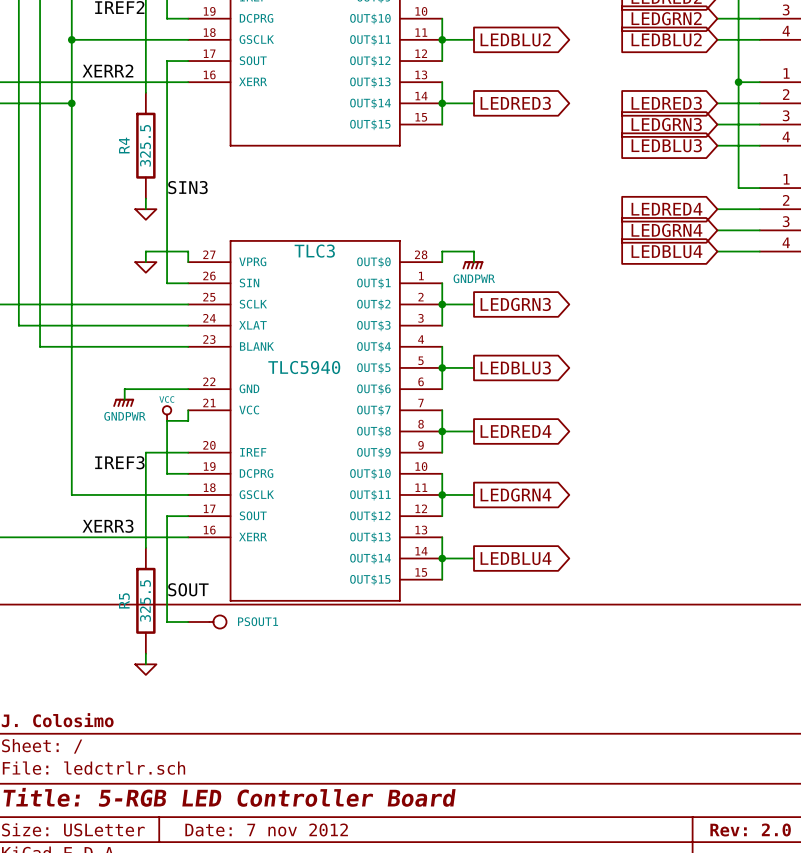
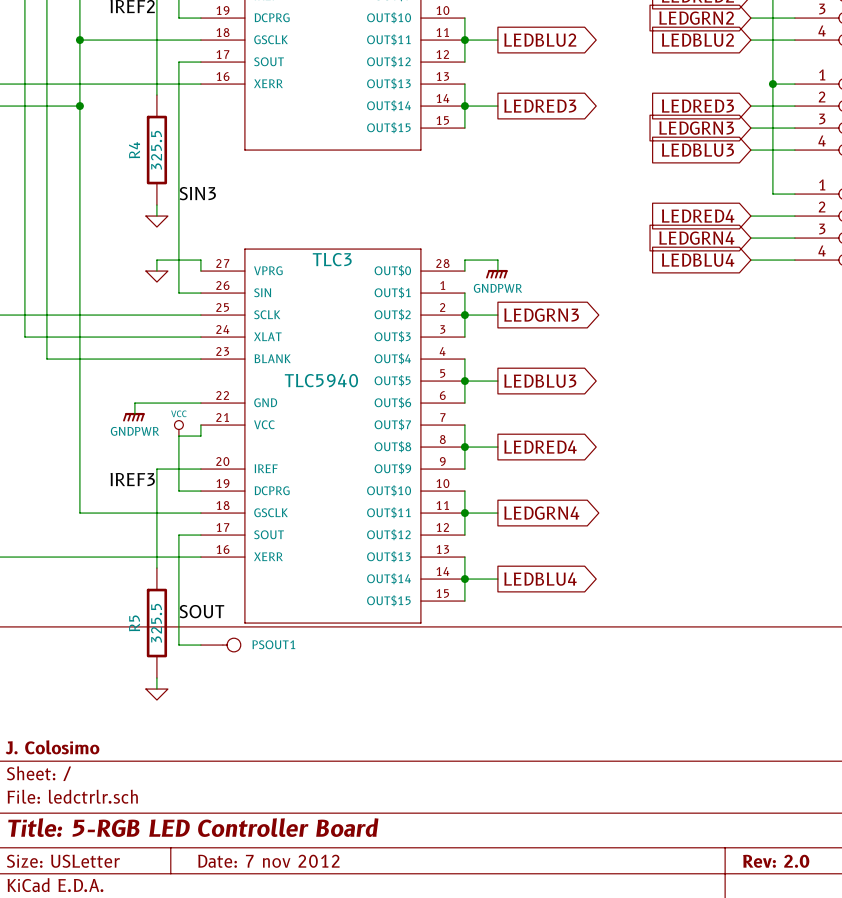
label: XERR2 (107, 70) -> none
label: XERR3 (108, 526) -> none

